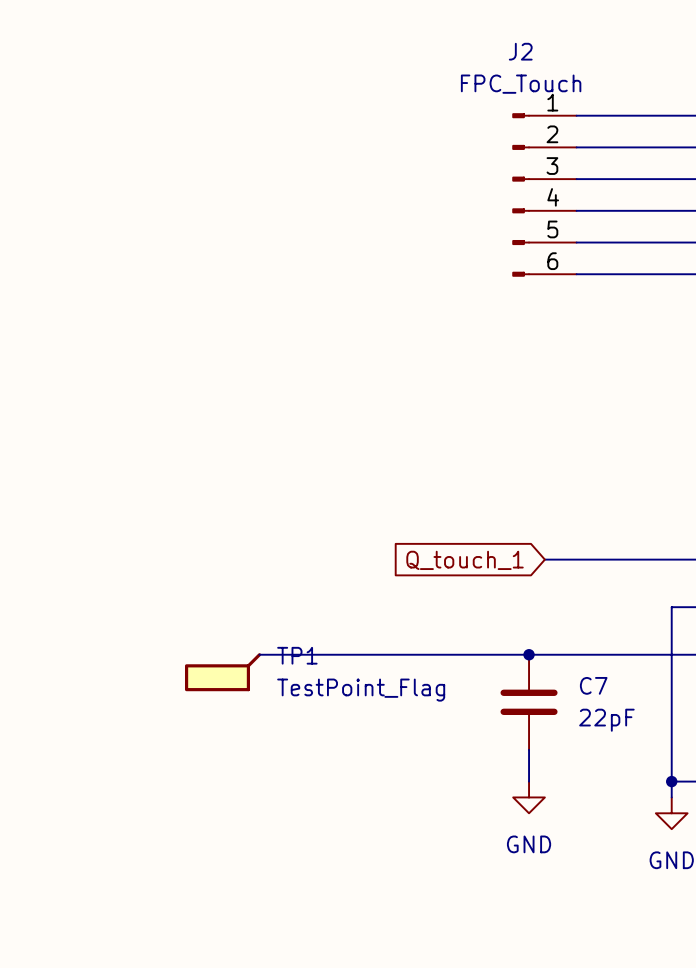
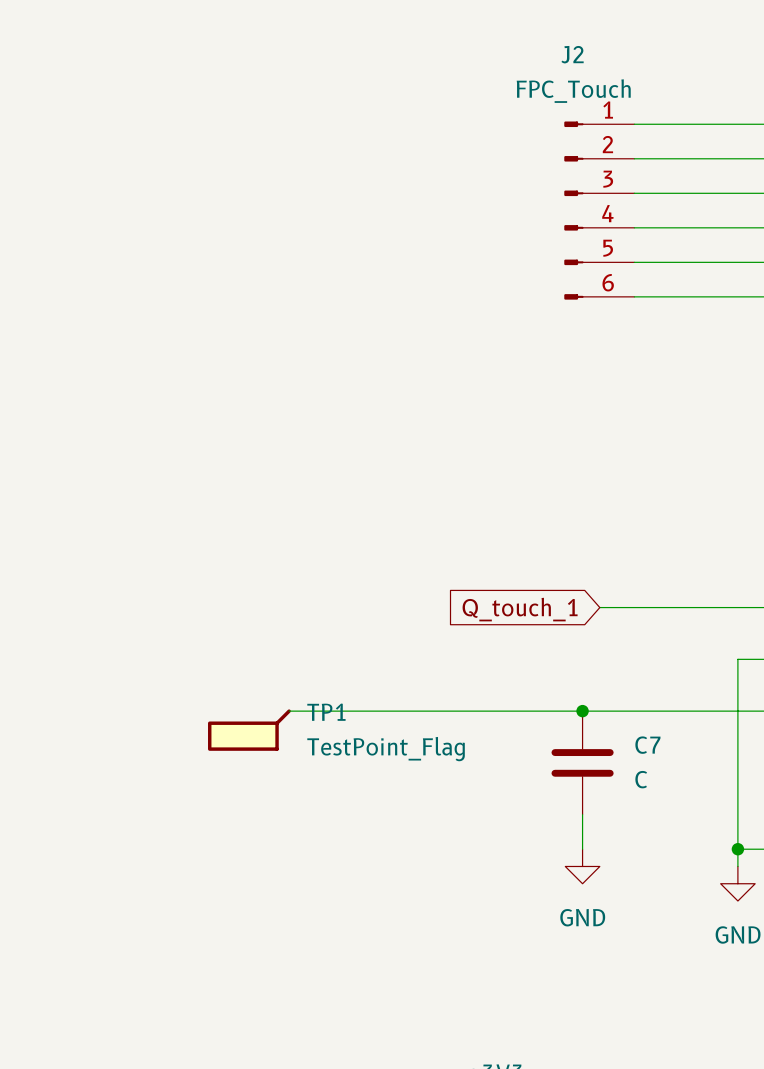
C7 value: 22pF (606, 720) -> C (641, 779)

